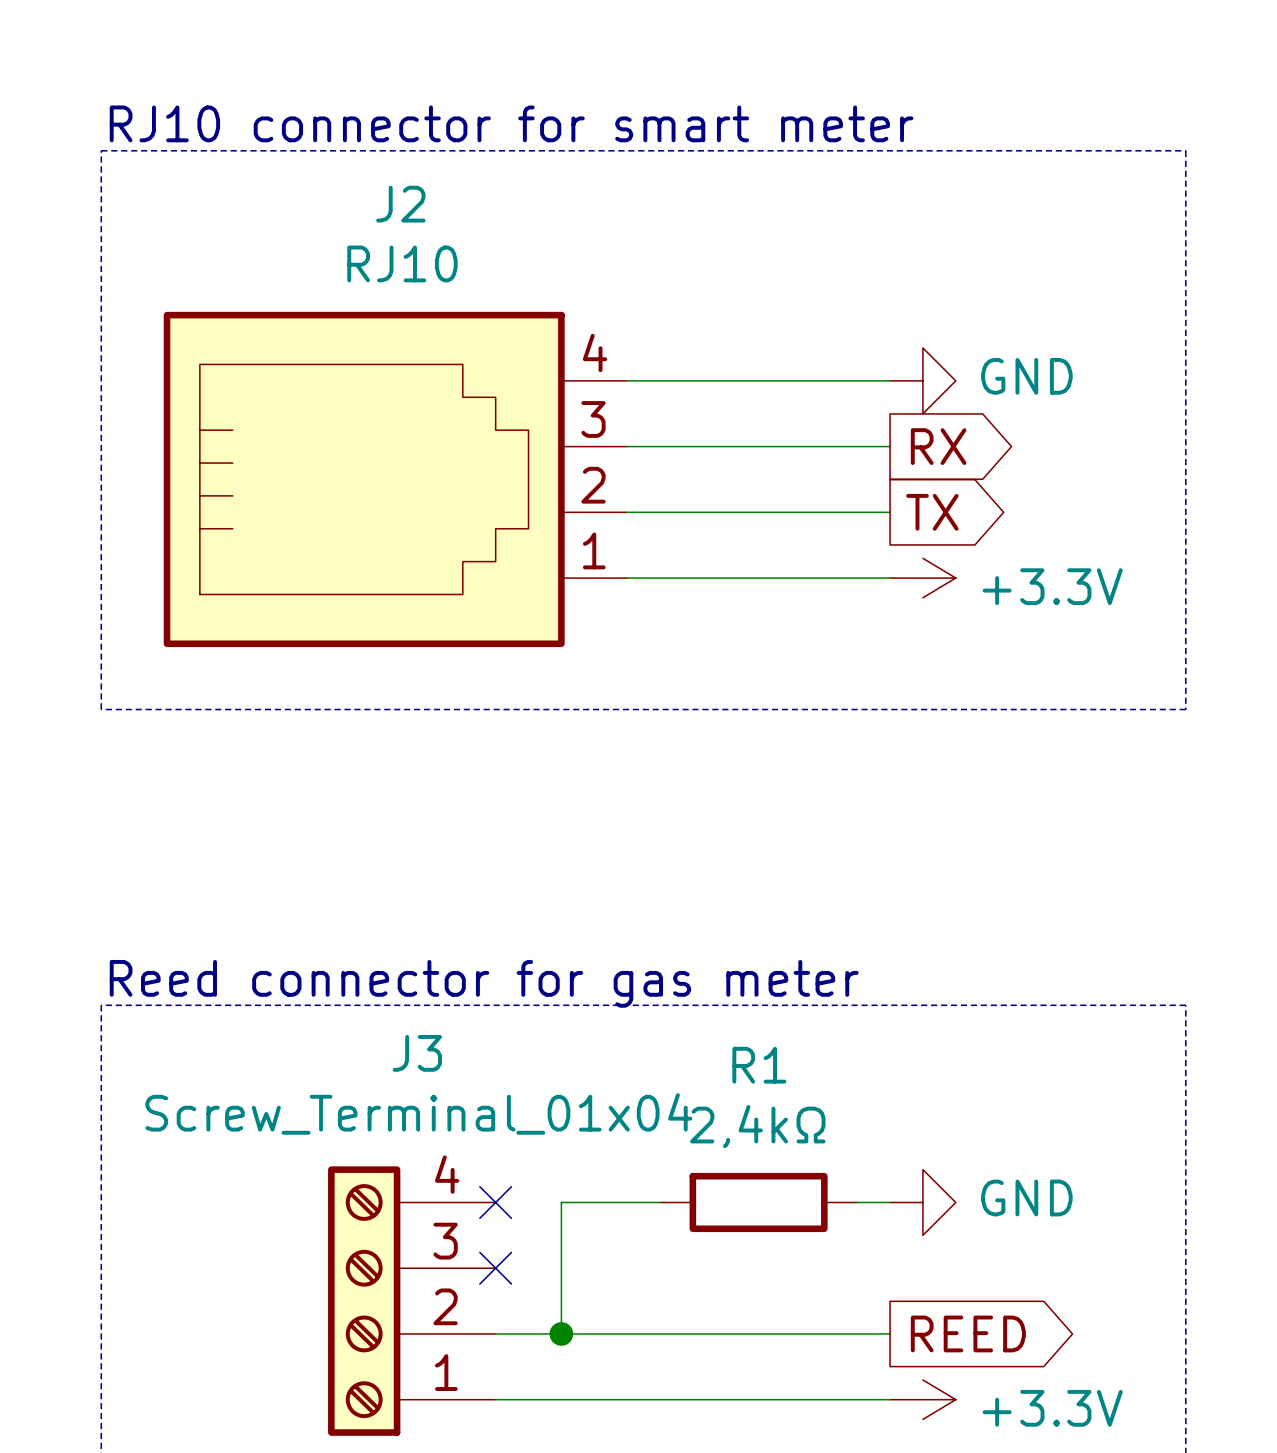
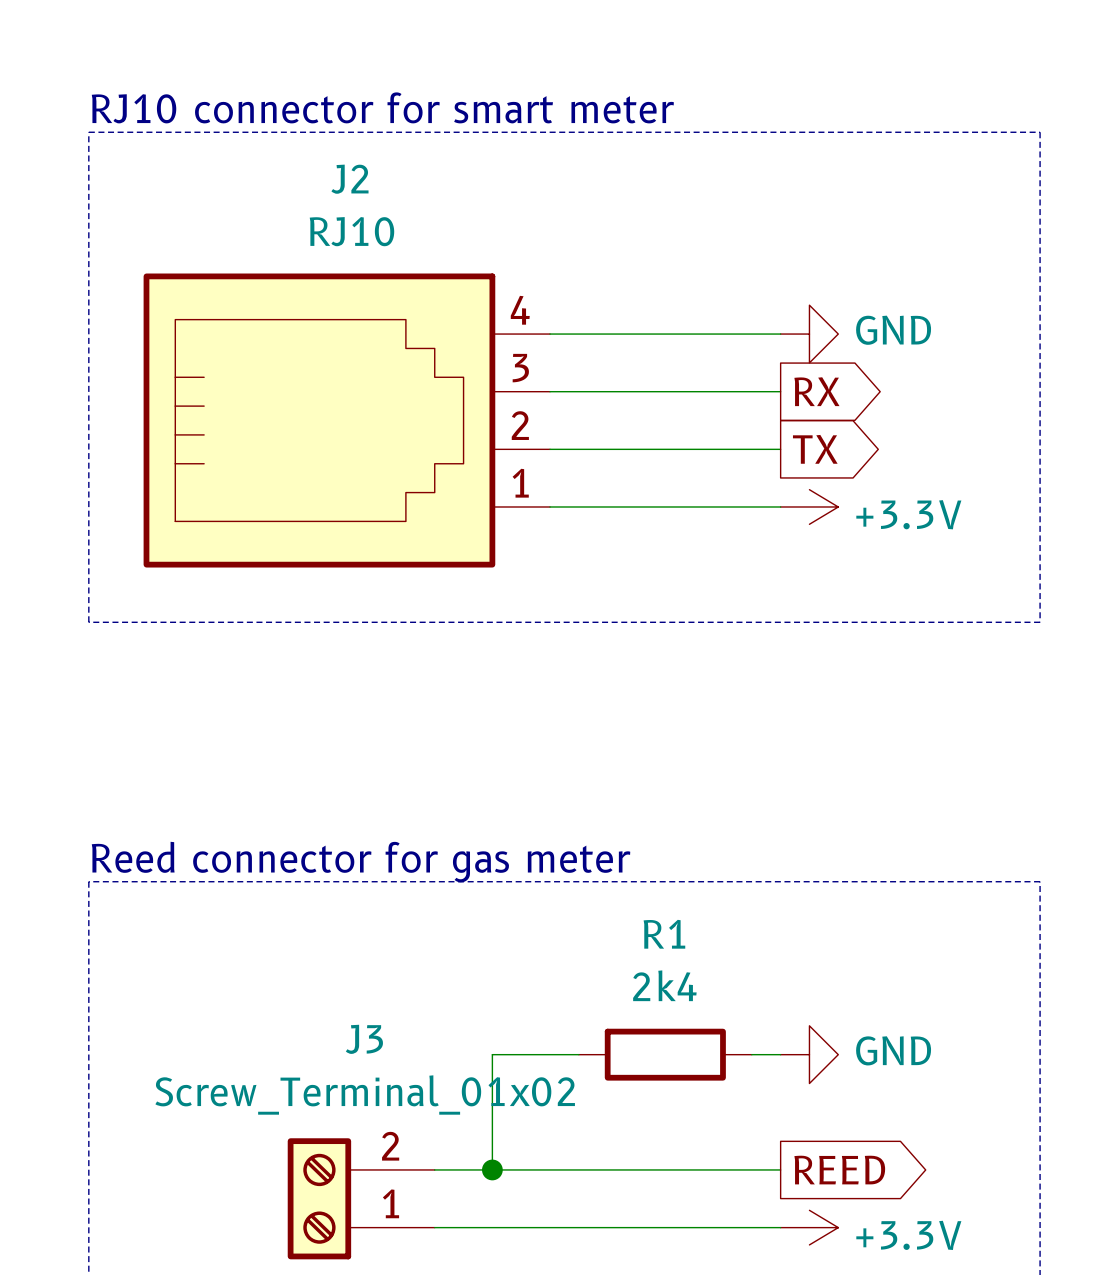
J3 name position: J3 (417, 1053) -> J3 (364, 1039)
J3 value: Screw_Terminal_01x04 (418, 1113) -> Screw_Terminal_01x02 (365, 1095)
R1 value: 2,4kΩ (757, 1126) -> 2k4 (664, 985)
J3 symbol: [328, 1166, 496, 1436] -> [287, 1138, 435, 1260]
no-connect mark: (495, 1202) -> none
no-connect mark: (495, 1268) -> none

